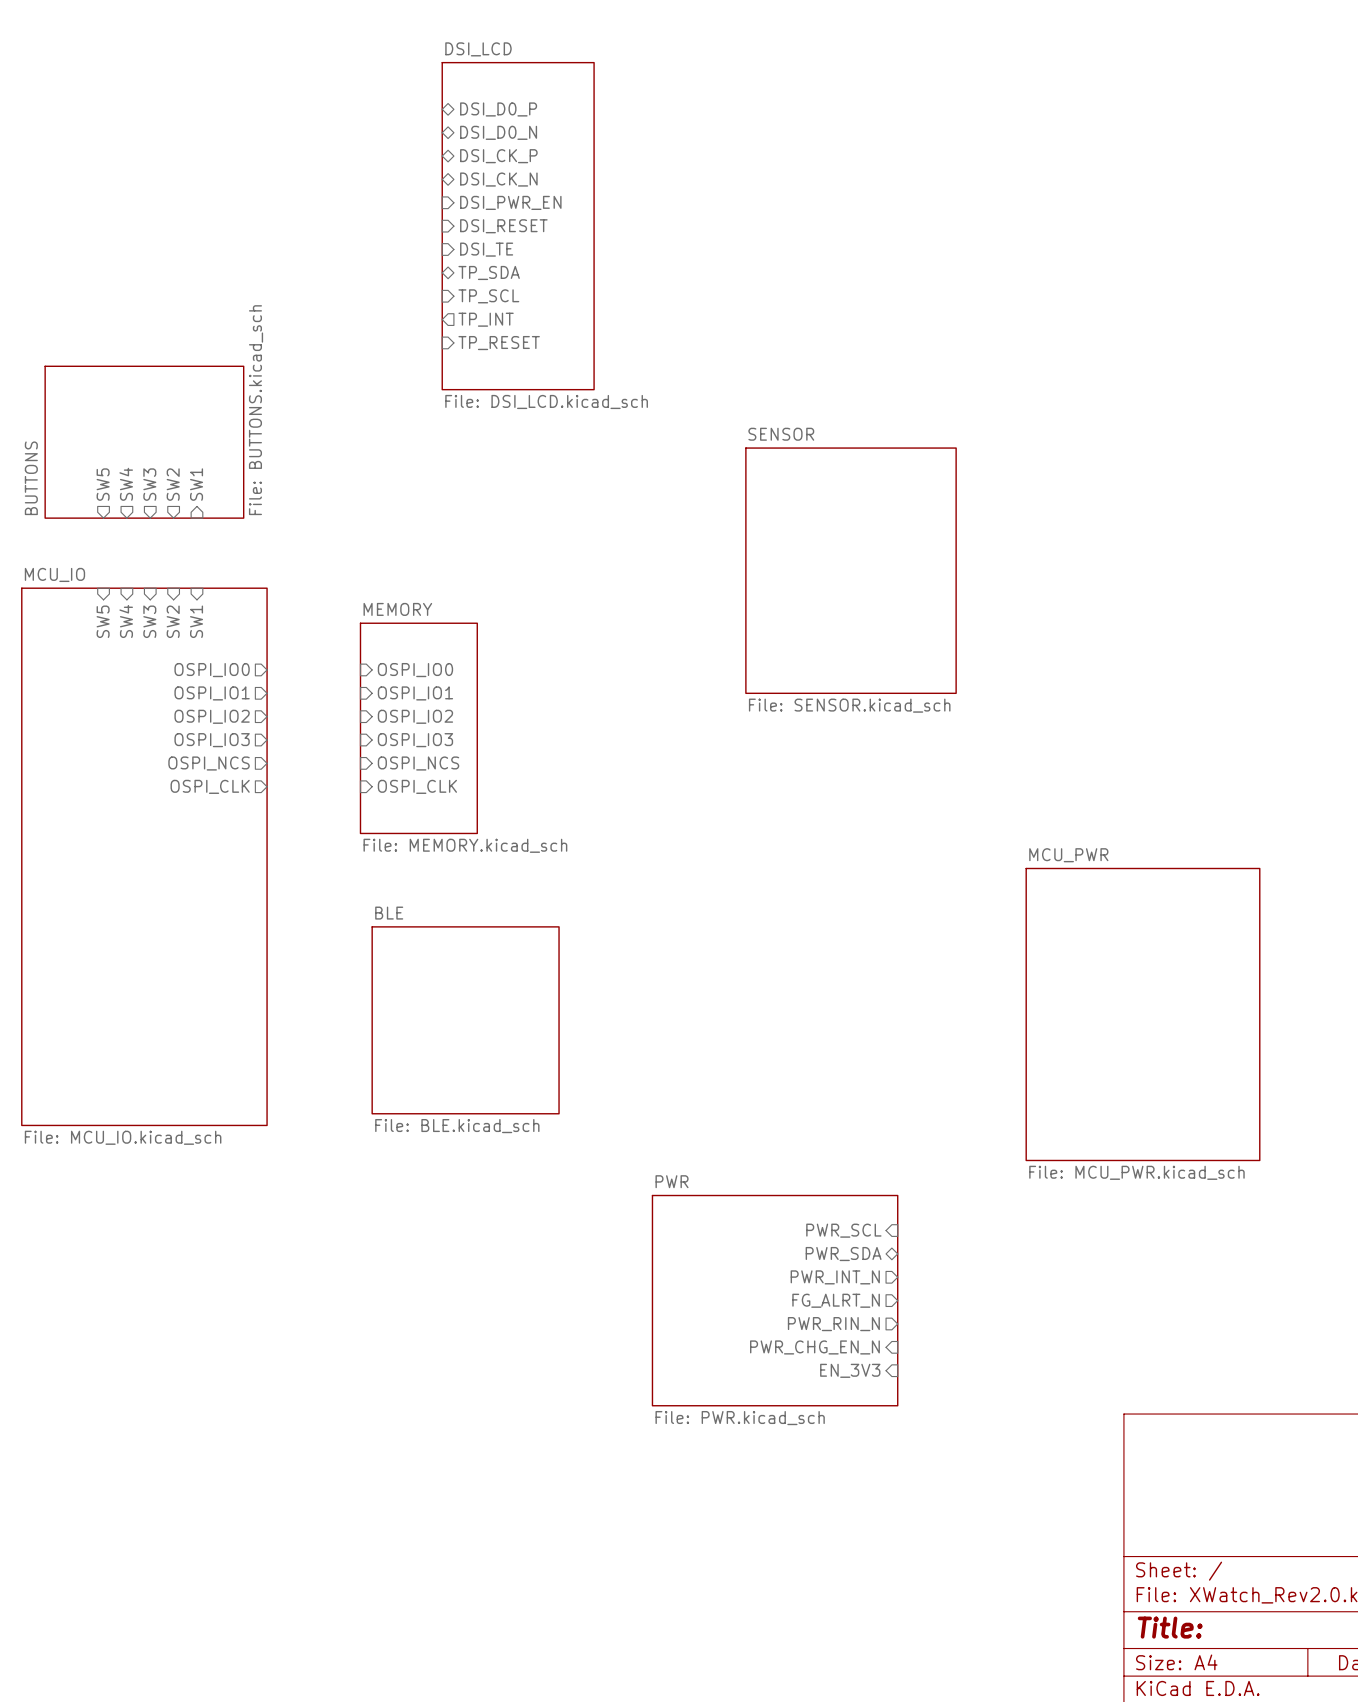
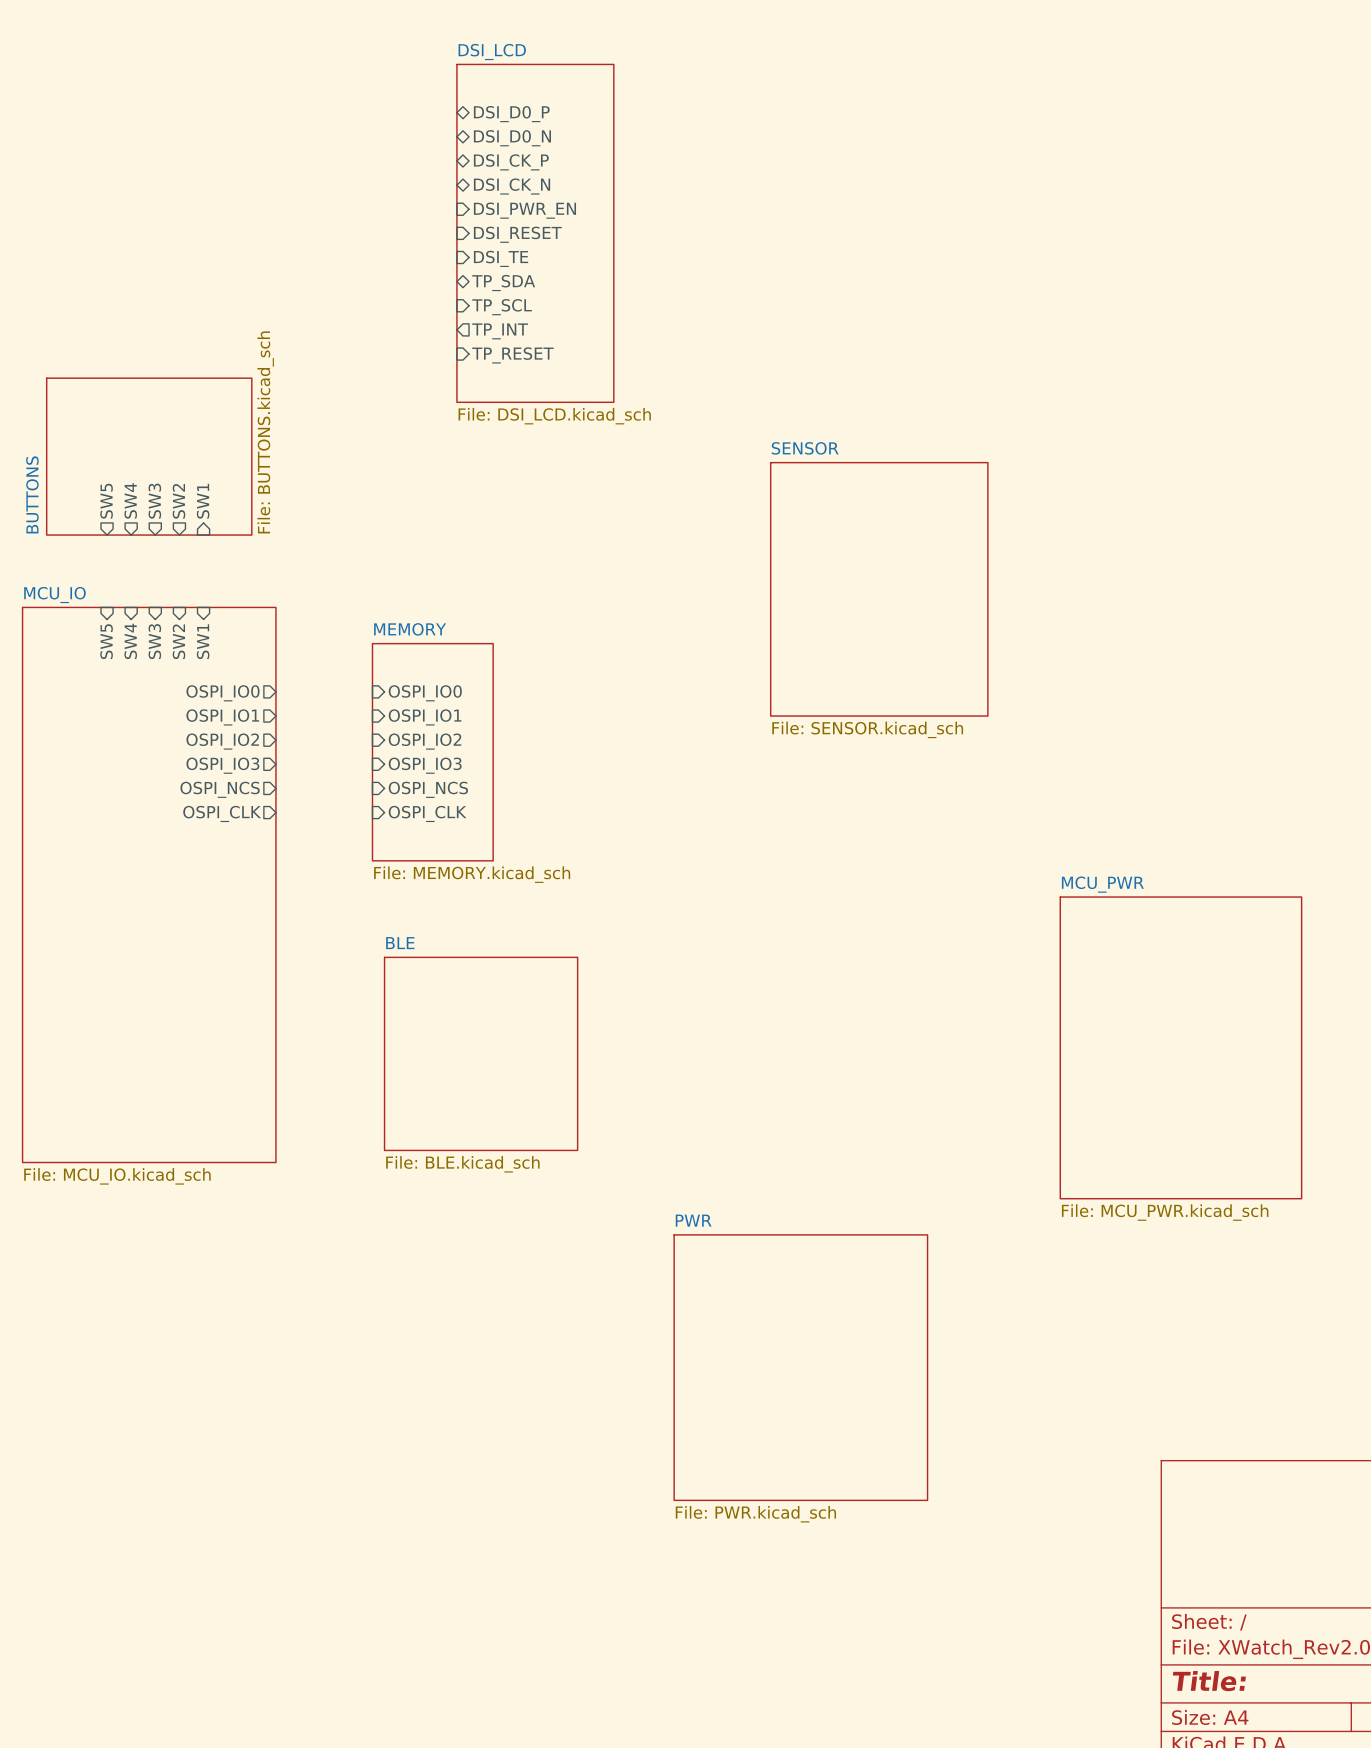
sheet pin: PWR_SCL (843, 1230) -> none
sheet pin: PWR_SDA (843, 1254) -> none
sheet pin: PWR_INT_N (835, 1277) -> none
sheet PWR: File: PWR.kicad_sch (775, 1300) -> none
sheet pin: FG_ALRT_N (836, 1300) -> none
sheet PWR: none -> File: PWR.kicad_sch (800, 1367)
sheet pin: PWR_RIN_N (833, 1324) -> none
sheet pin: PWR_CHG_EN_N (814, 1347) -> none
sheet pin: EN_3V3 (850, 1370) -> none

